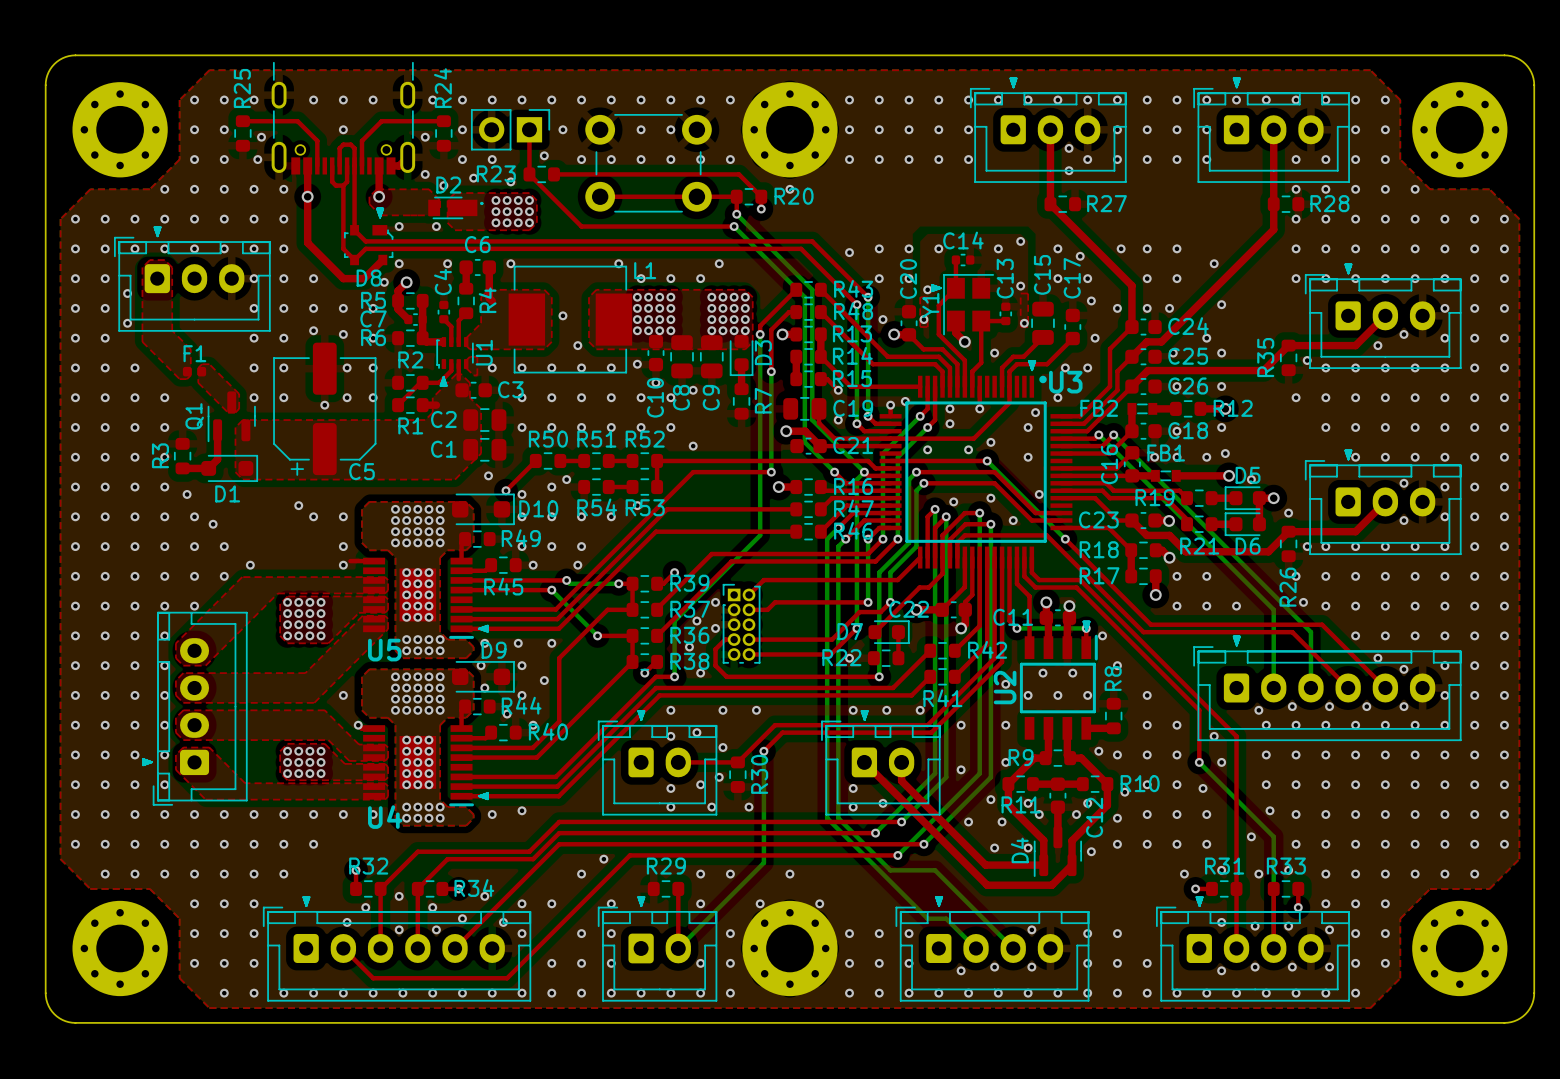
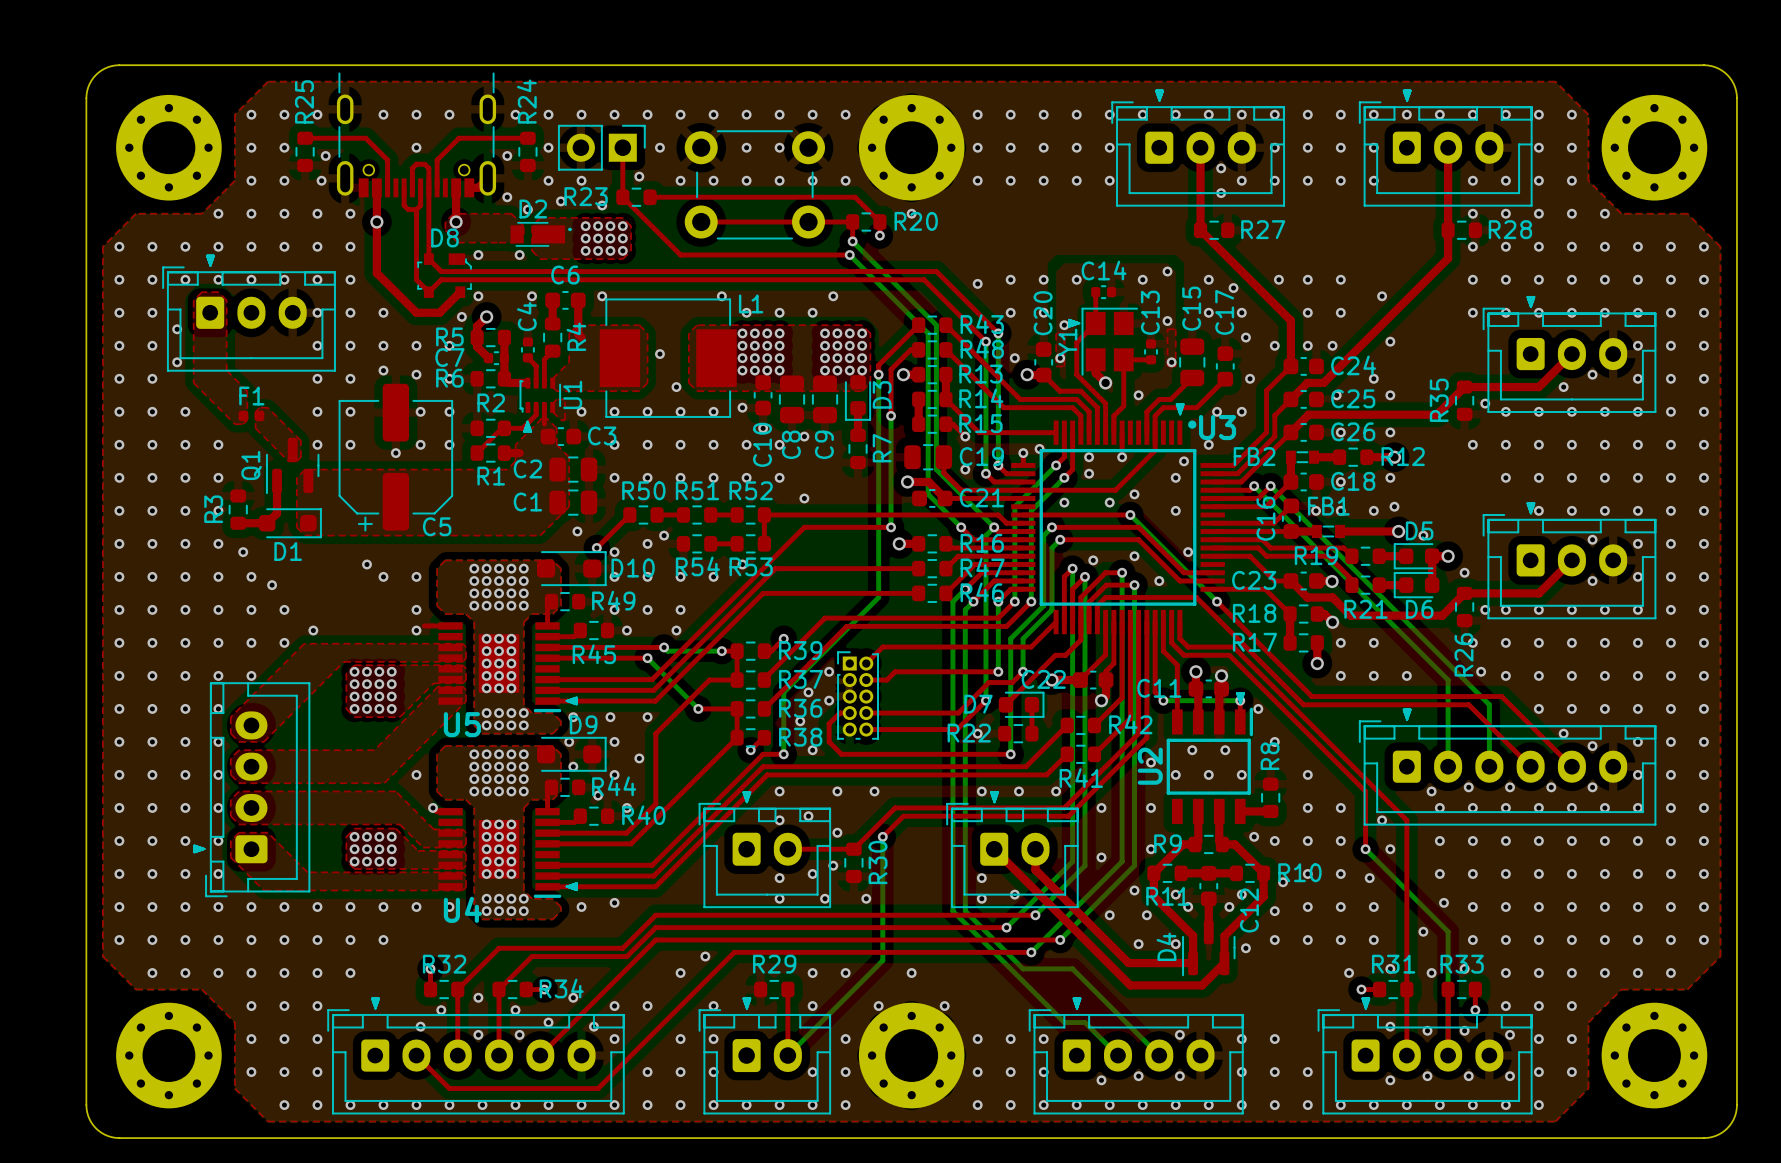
drawing: [375, 207, 385, 219] -> none
D8 name position: D8 (369, 278) -> D8 (444, 237)

